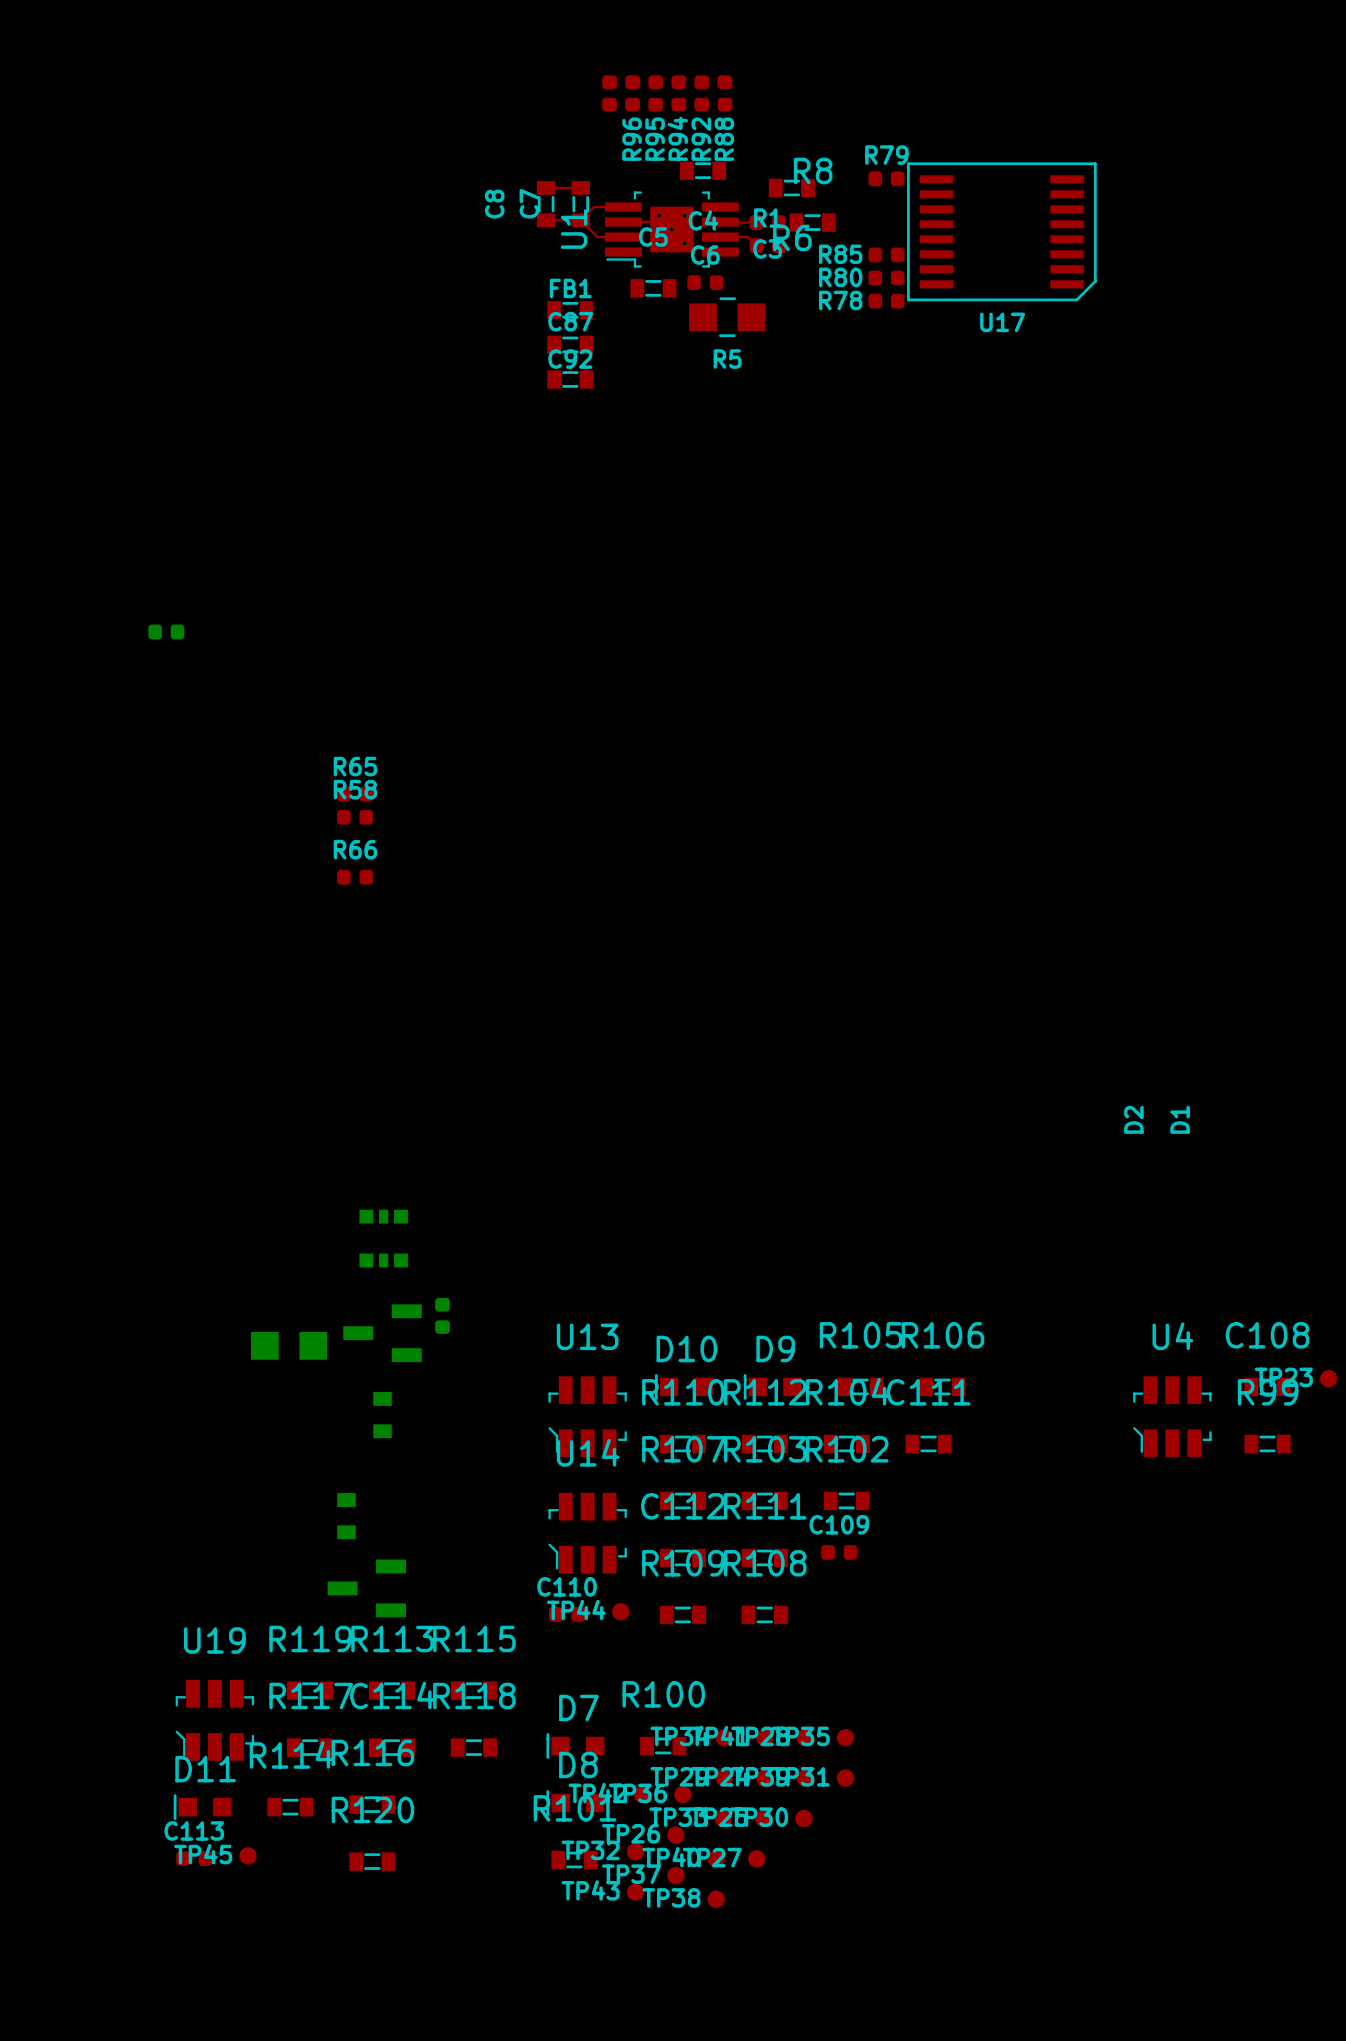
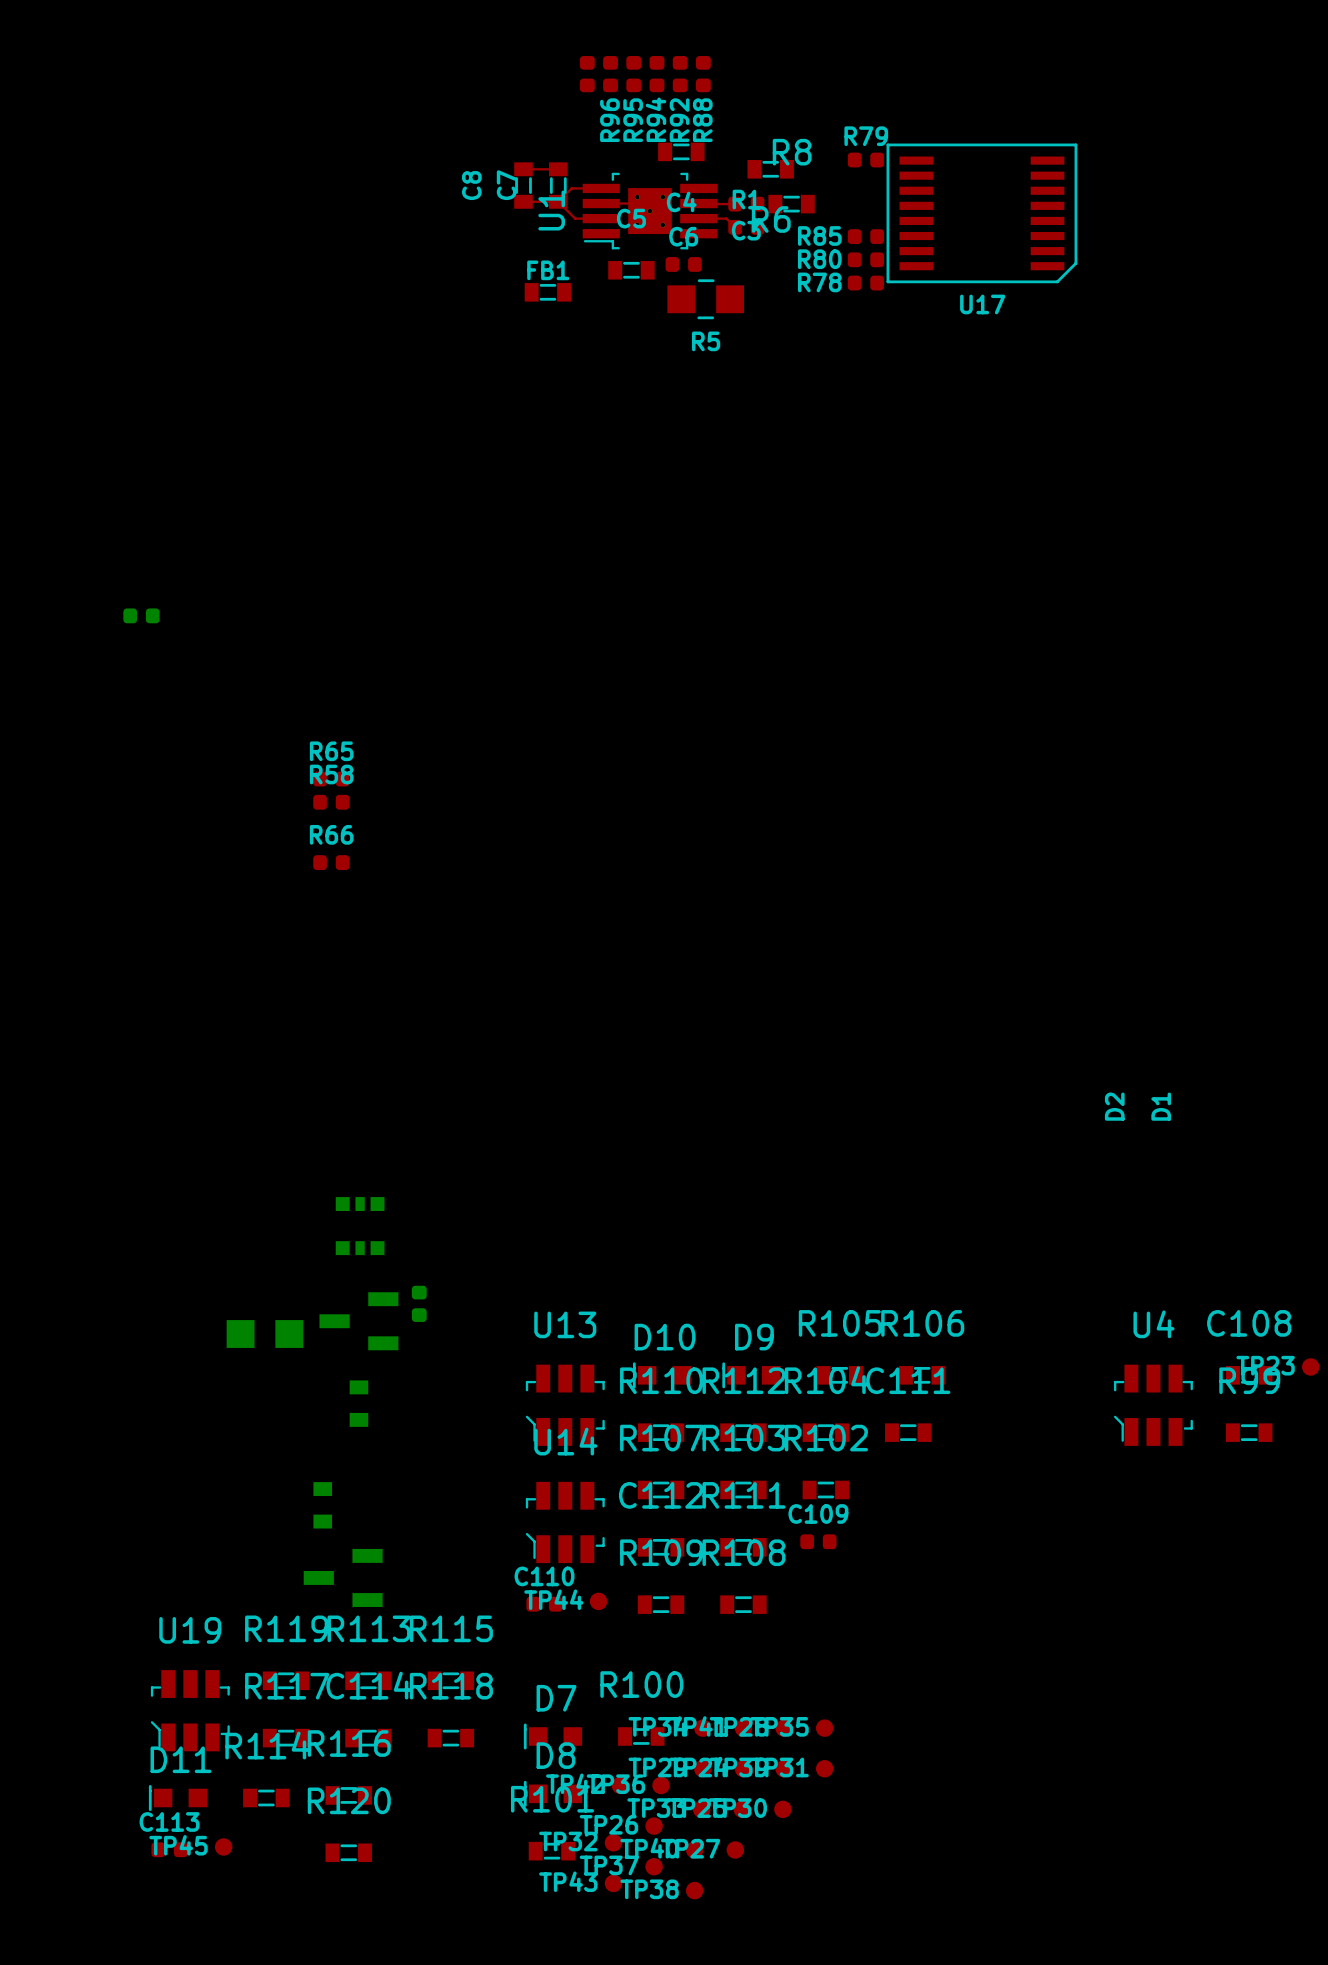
C87: (570, 344) -> none
C92: (570, 379) -> none

